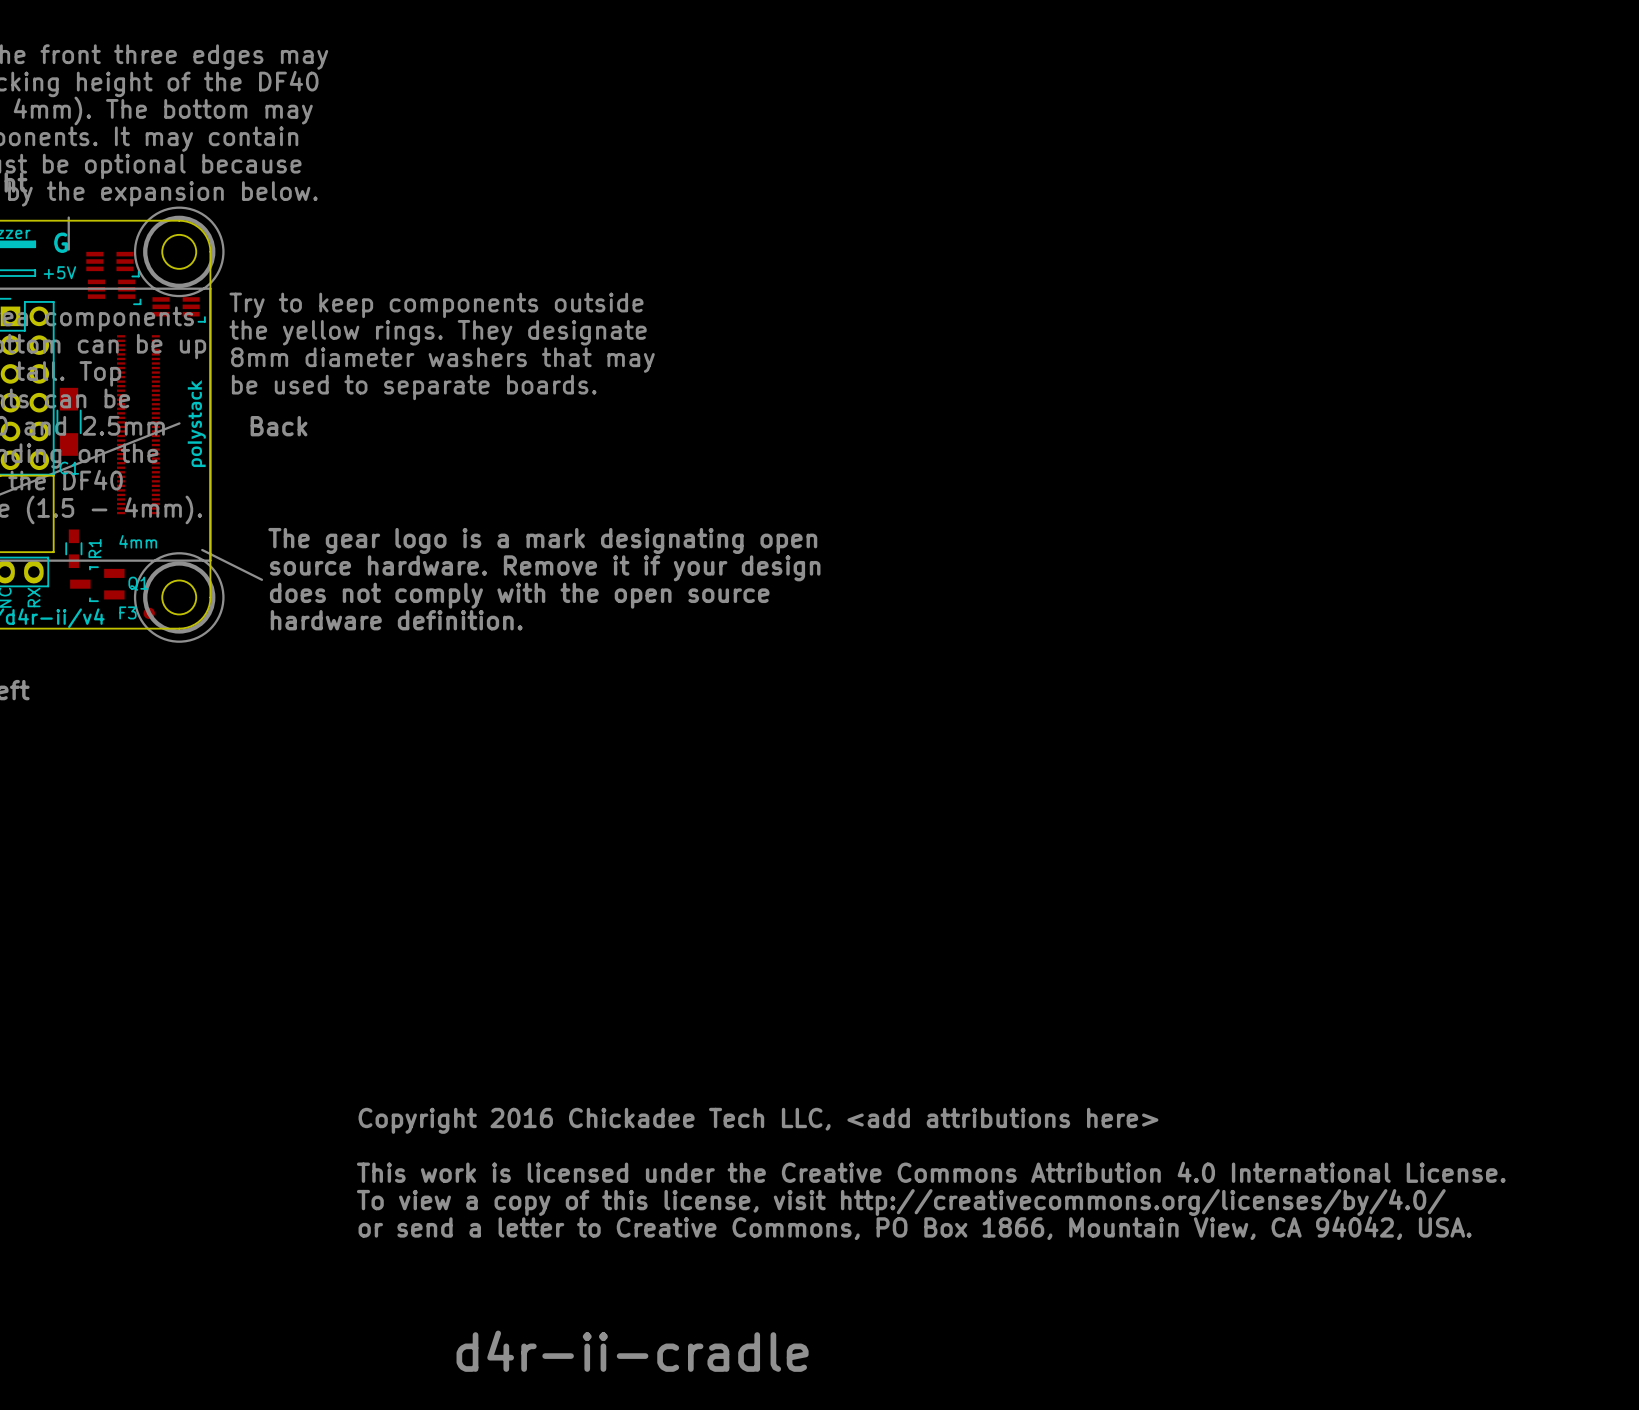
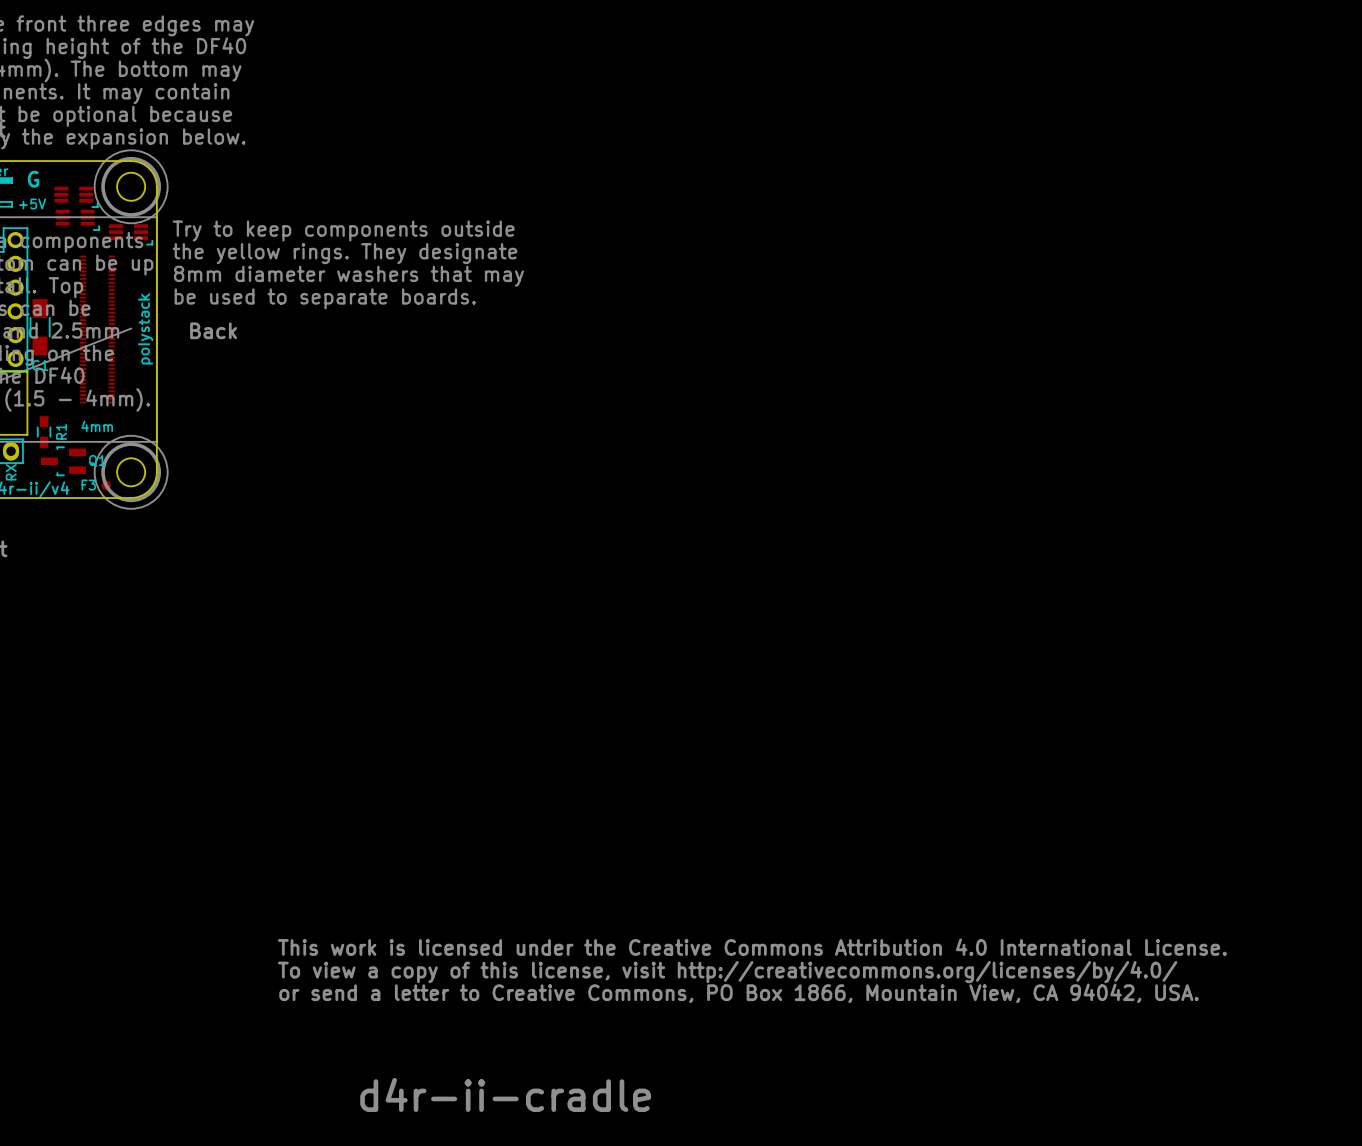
line: (68, 217) (68, 249) -> none
text: The gear logo is a mark designating open (542, 540) -> none
line: (202, 550) (261, 579) -> none
text: source hardware. Remove it if your design (545, 568) -> none
text: does not comply with the open source (519, 595) -> none
text: hardware definition. (396, 620) -> none
text: Copyright 2016 Chickadee Tech LLC, <add attributions here> (758, 1120) -> none

